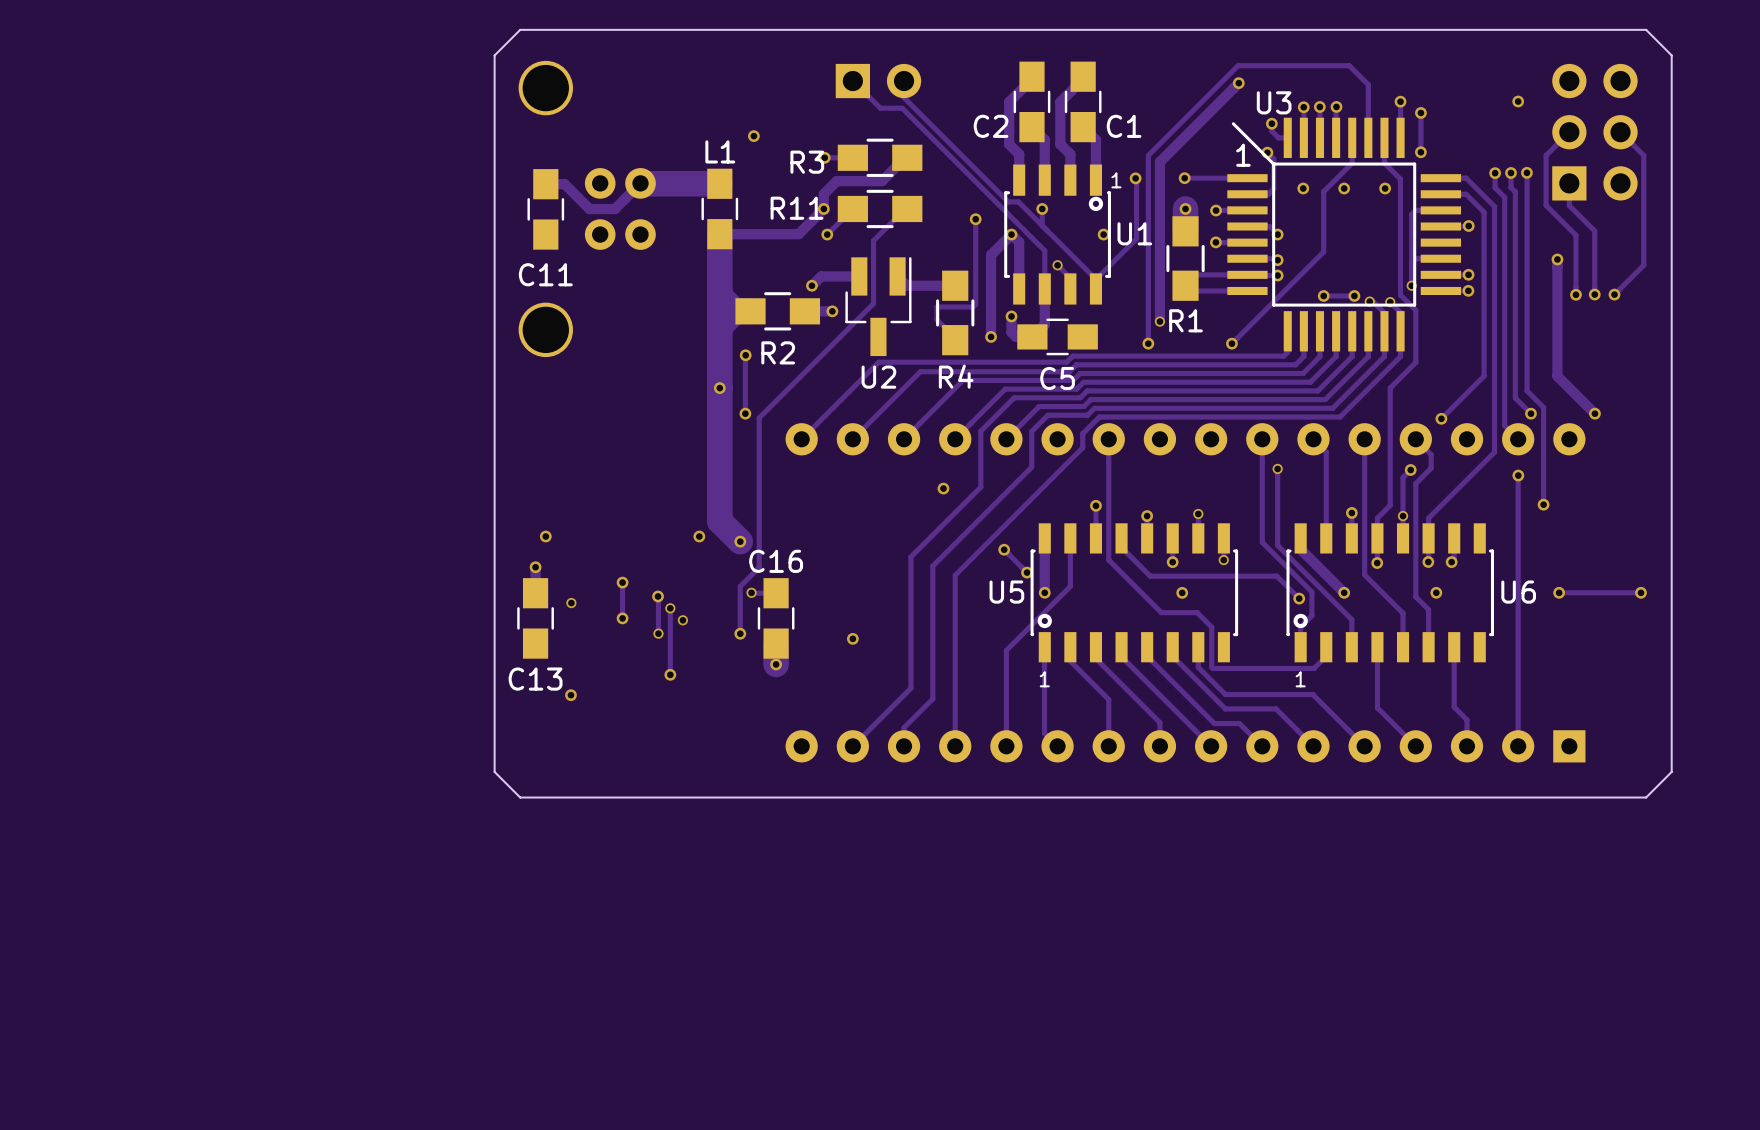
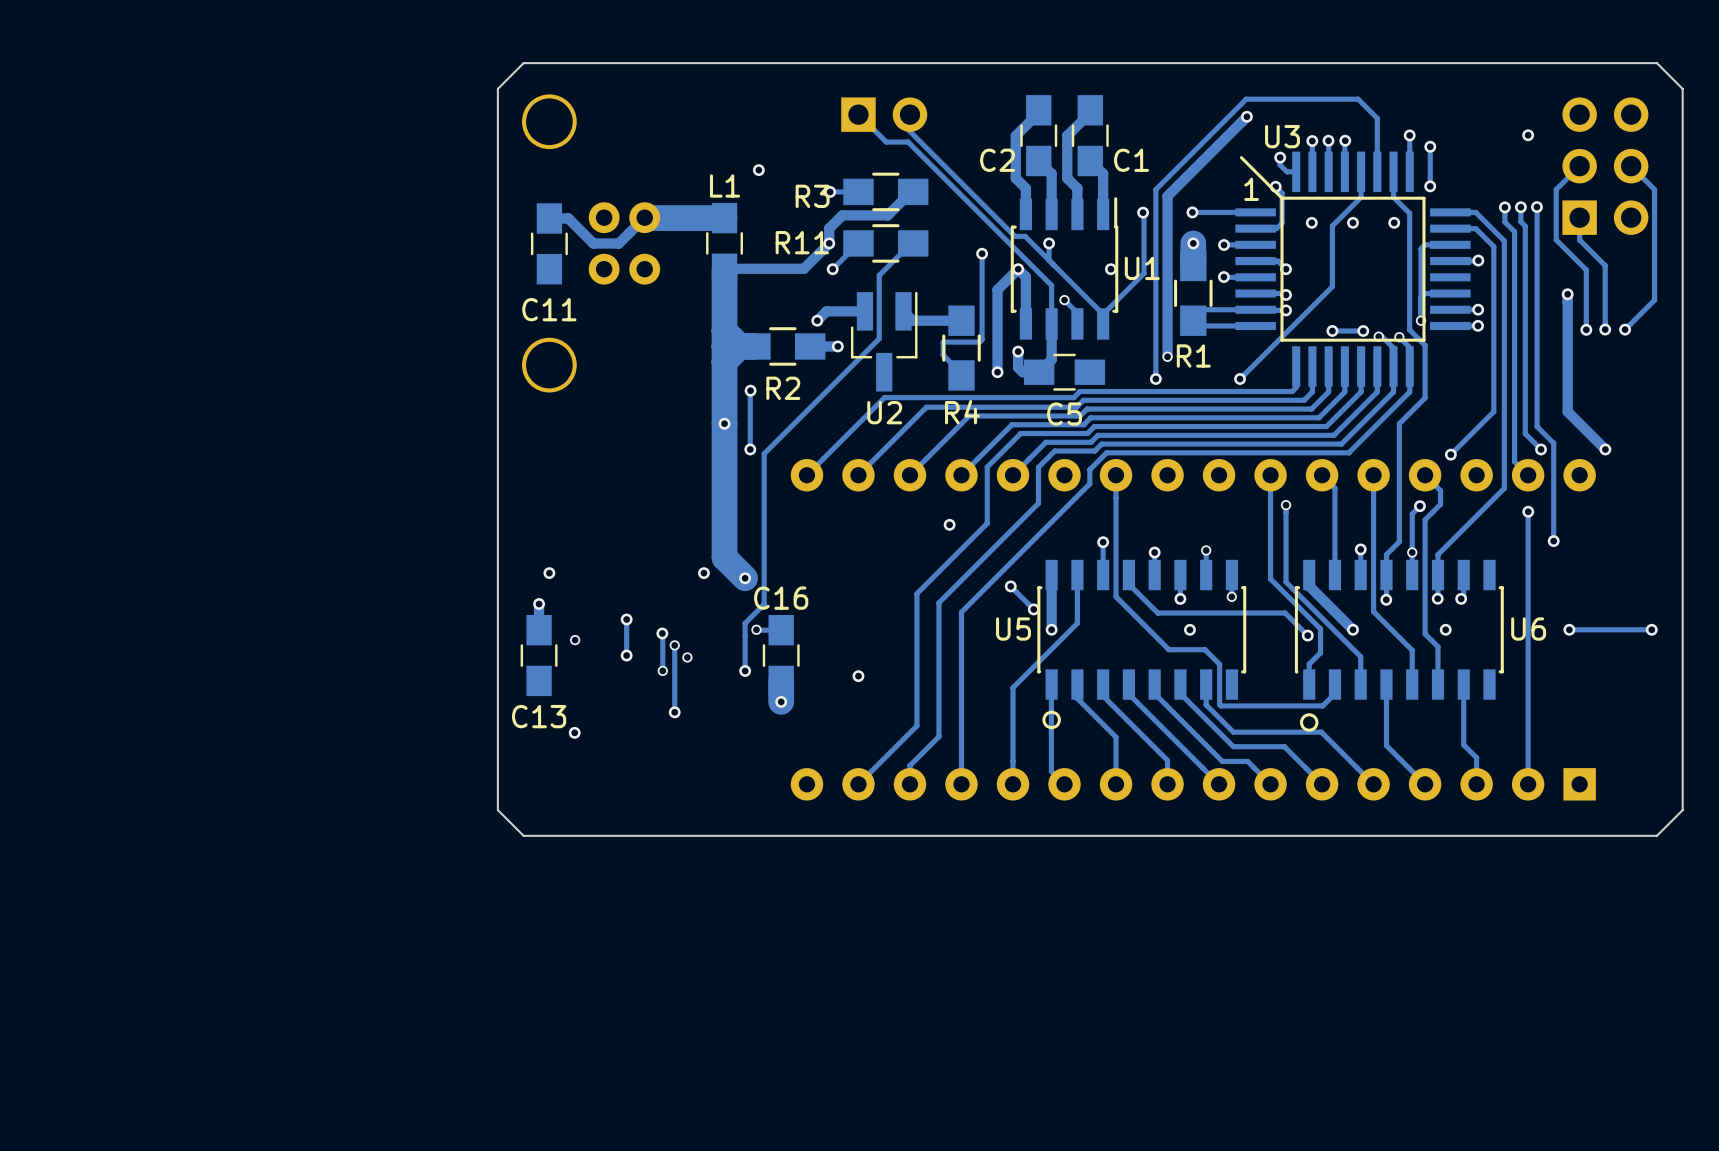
U1 footprint: [1004, 164, 1111, 305] -> [1010, 197, 1119, 340]
text: 1 (1116, 180) -> none
drawing: [1088, 196, 1104, 211] -> none
U5 footprint: [1030, 523, 1239, 663] -> [1037, 559, 1247, 730]
U6 footprint: [1286, 523, 1495, 663] -> [1294, 559, 1504, 732]
drawing: [1037, 613, 1052, 629] -> none
drawing: [1293, 613, 1308, 629] -> none
text: 1 (1044, 679) -> none
text: 1 (1300, 679) -> none

